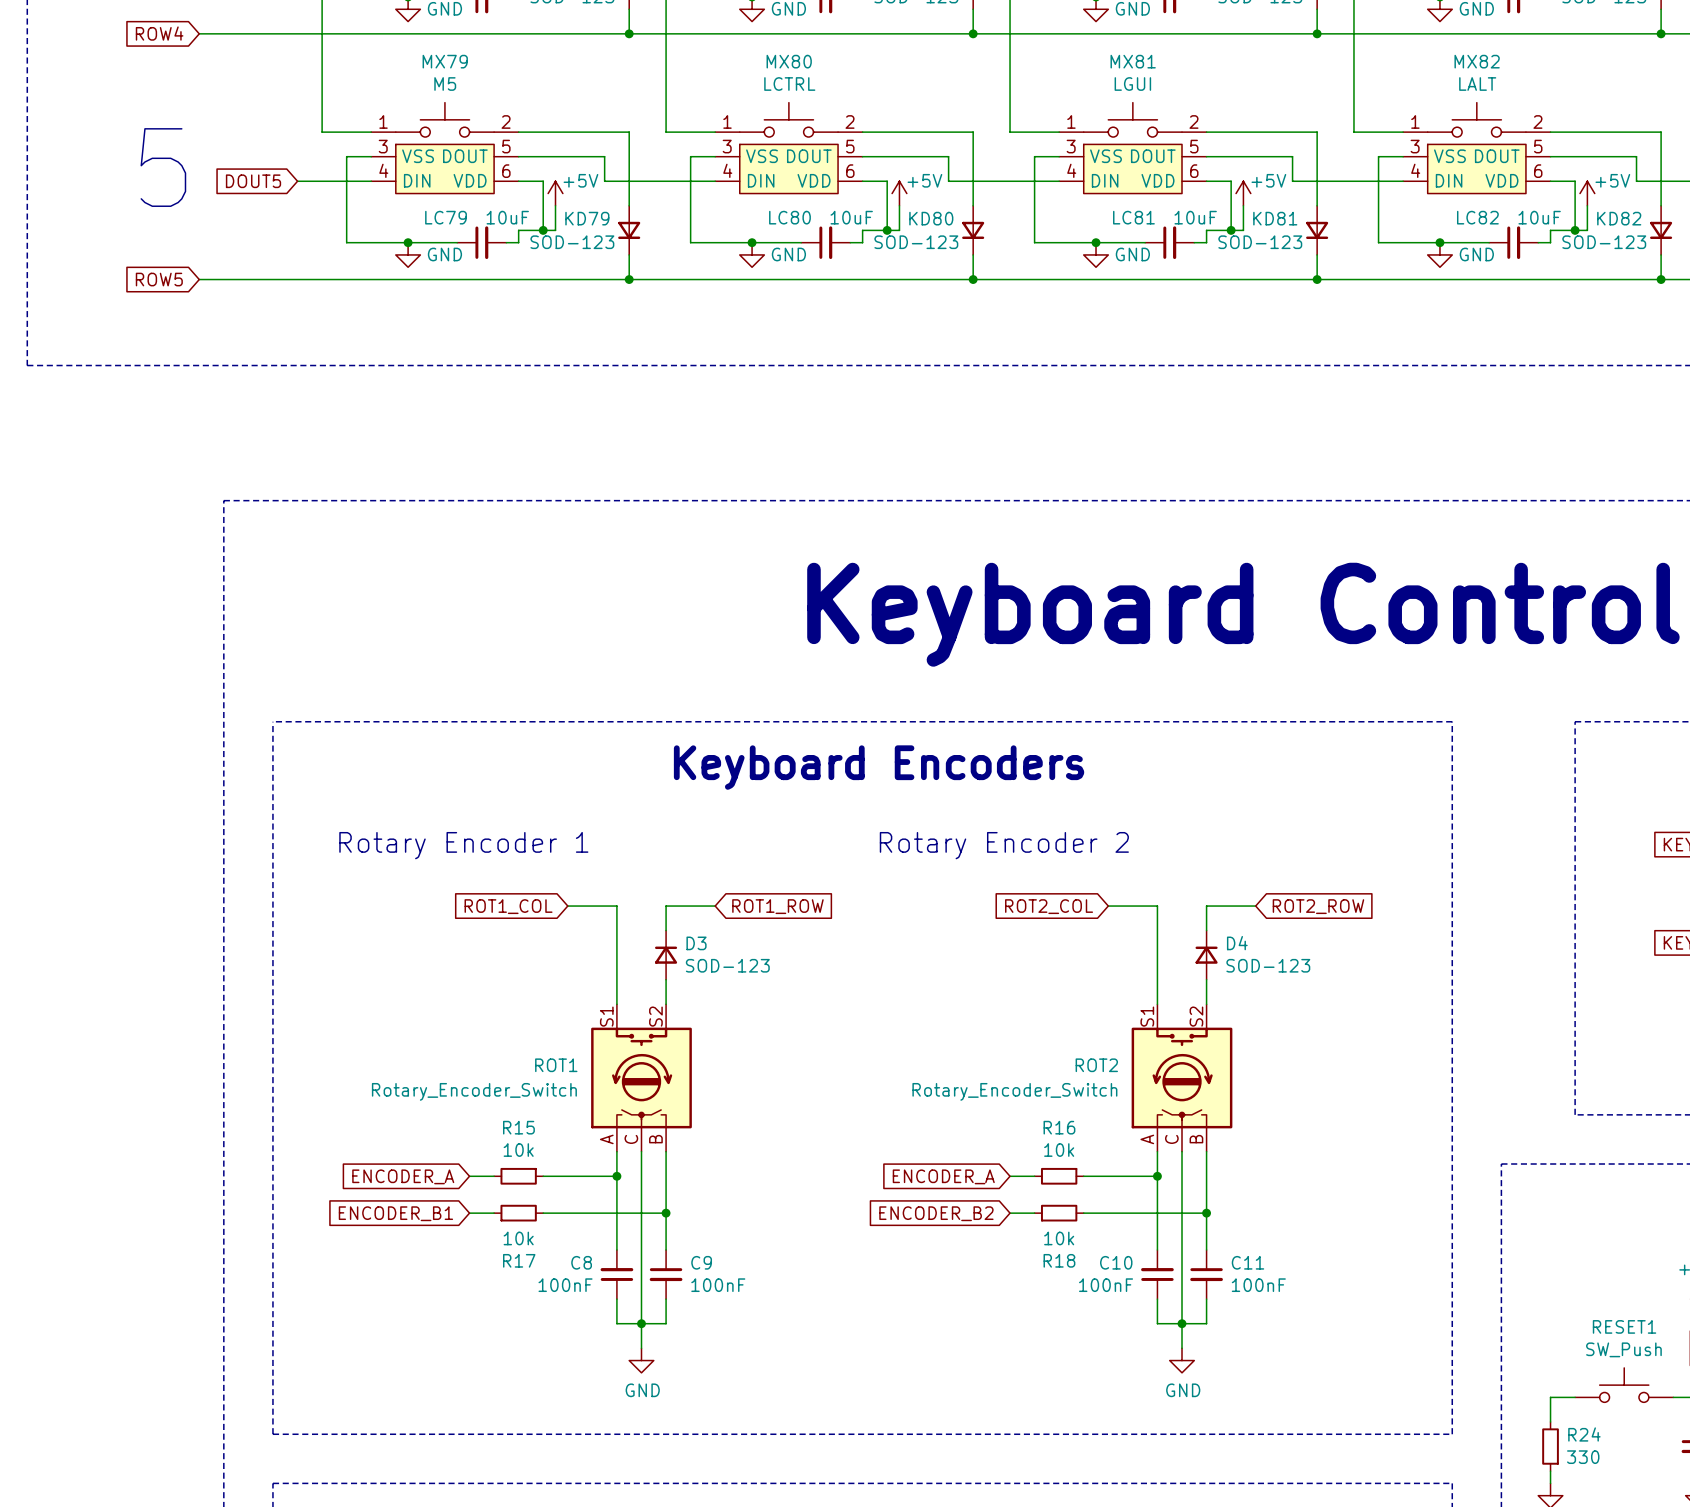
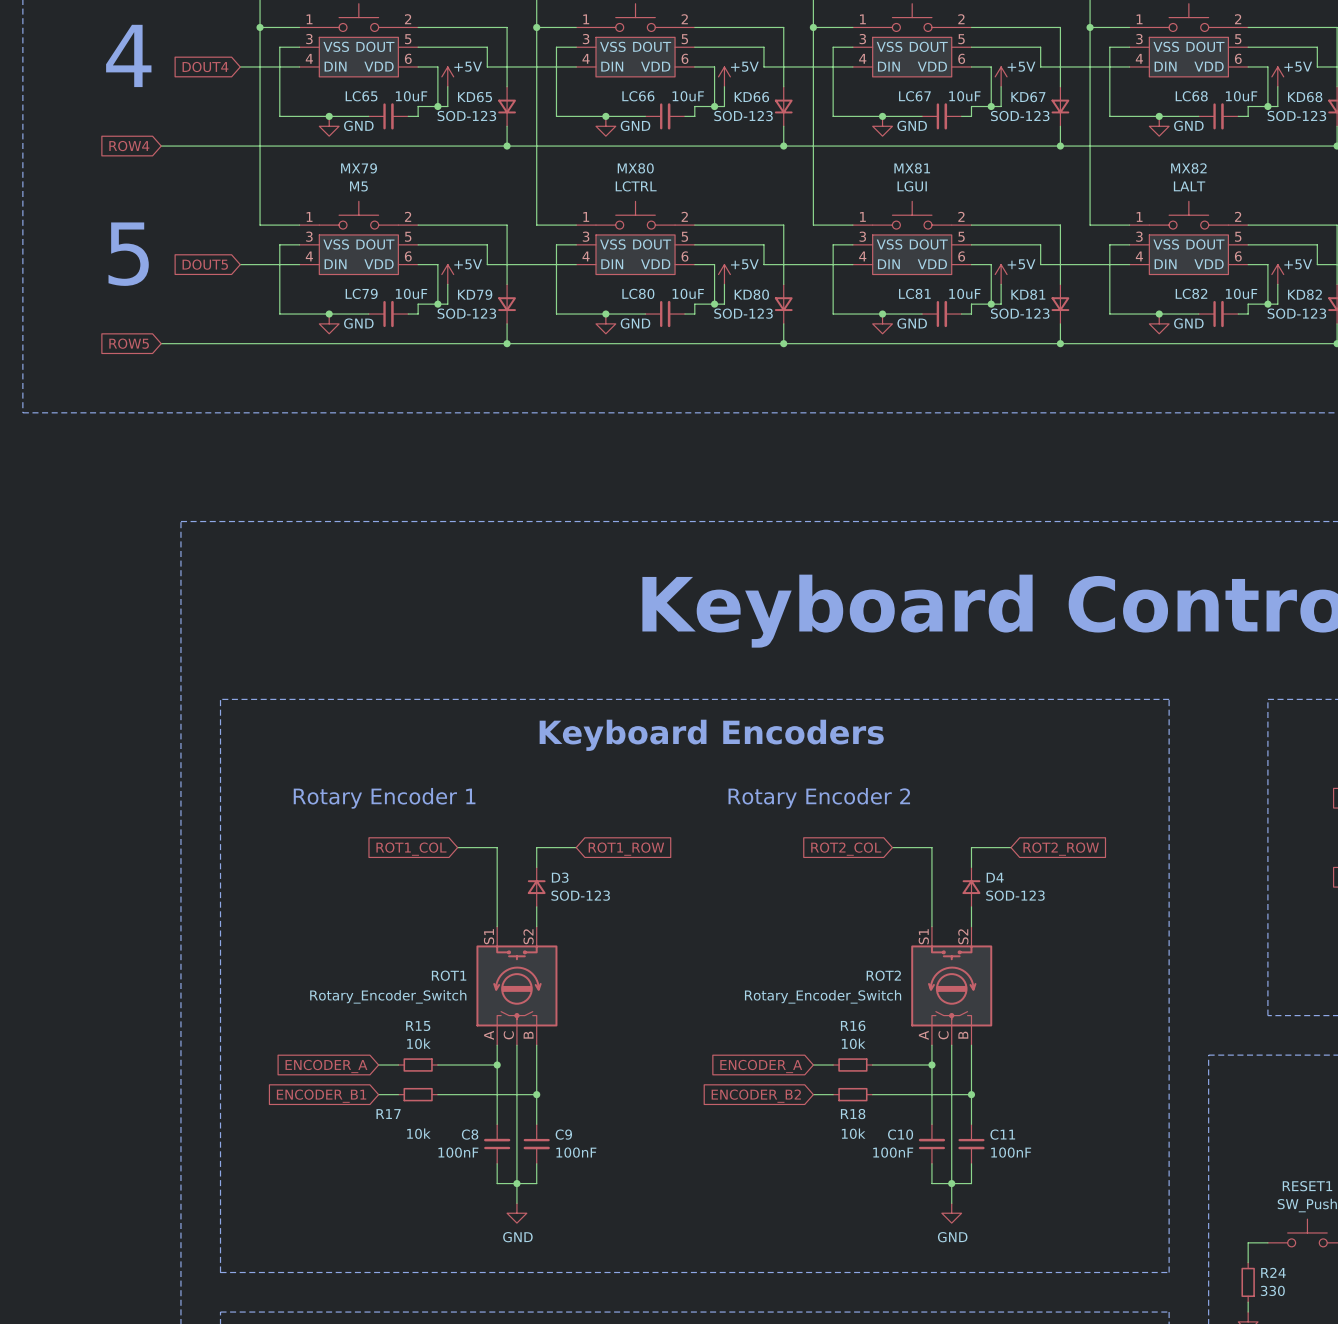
R17 value position: 10k (518, 1238) -> 10k (418, 1133)
R18 value position: 10k (1059, 1238) -> 10k (853, 1133)
R17 name position: R17 (519, 1260) -> R17 (388, 1114)
R18 name position: R18 (1059, 1260) -> R18 (853, 1114)

